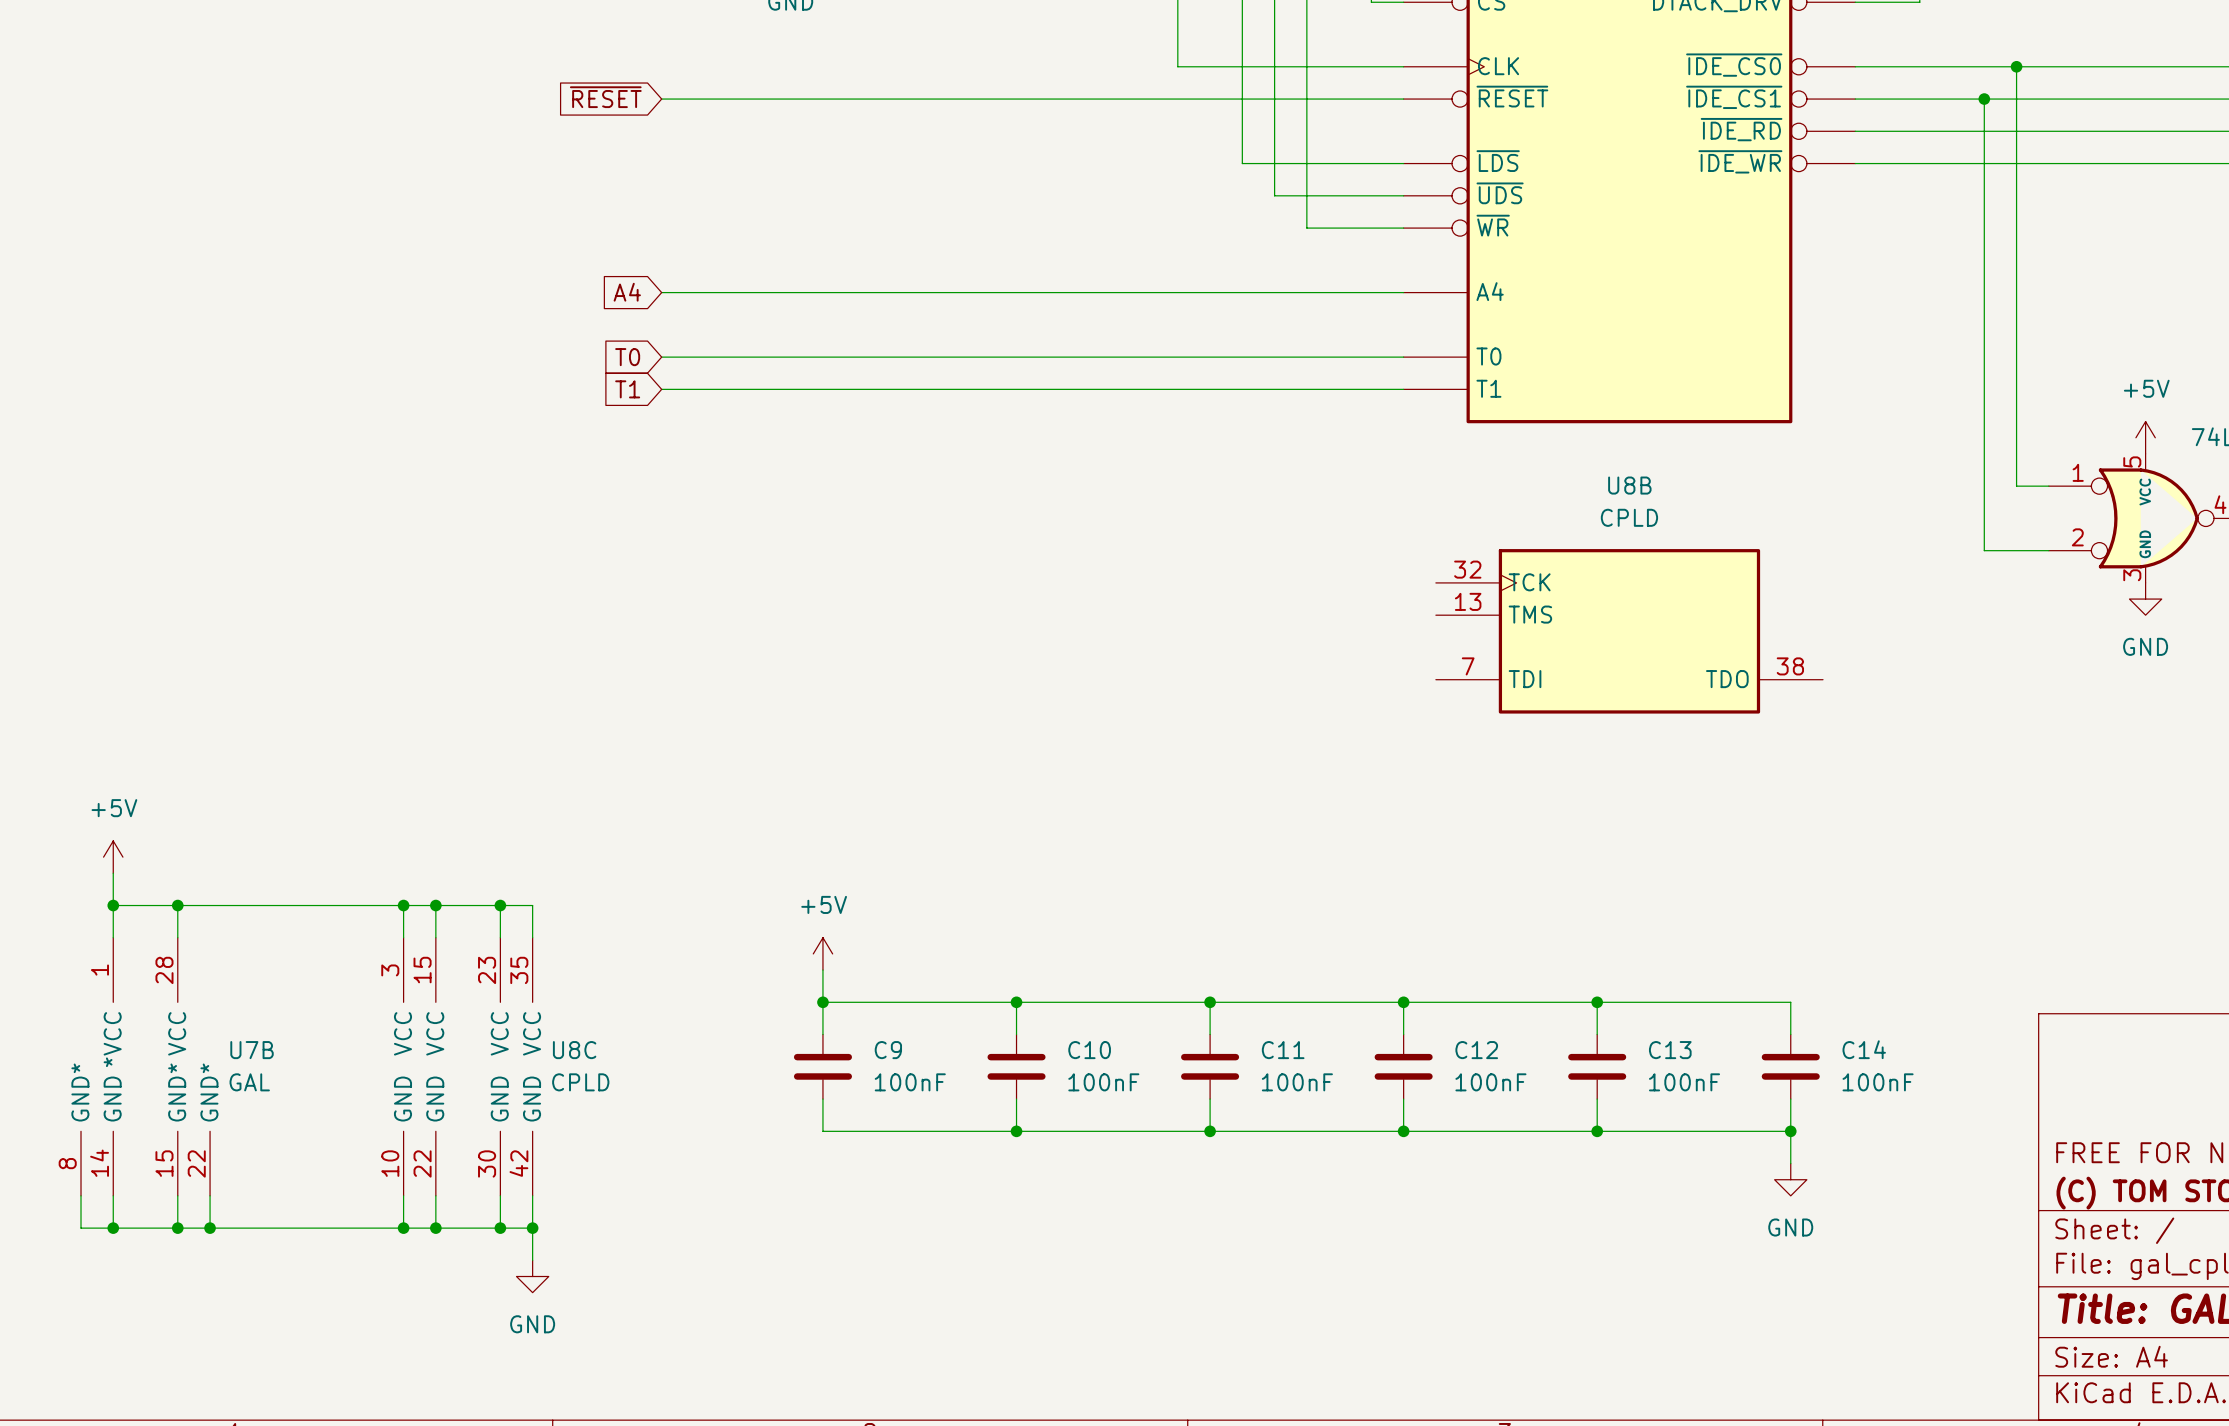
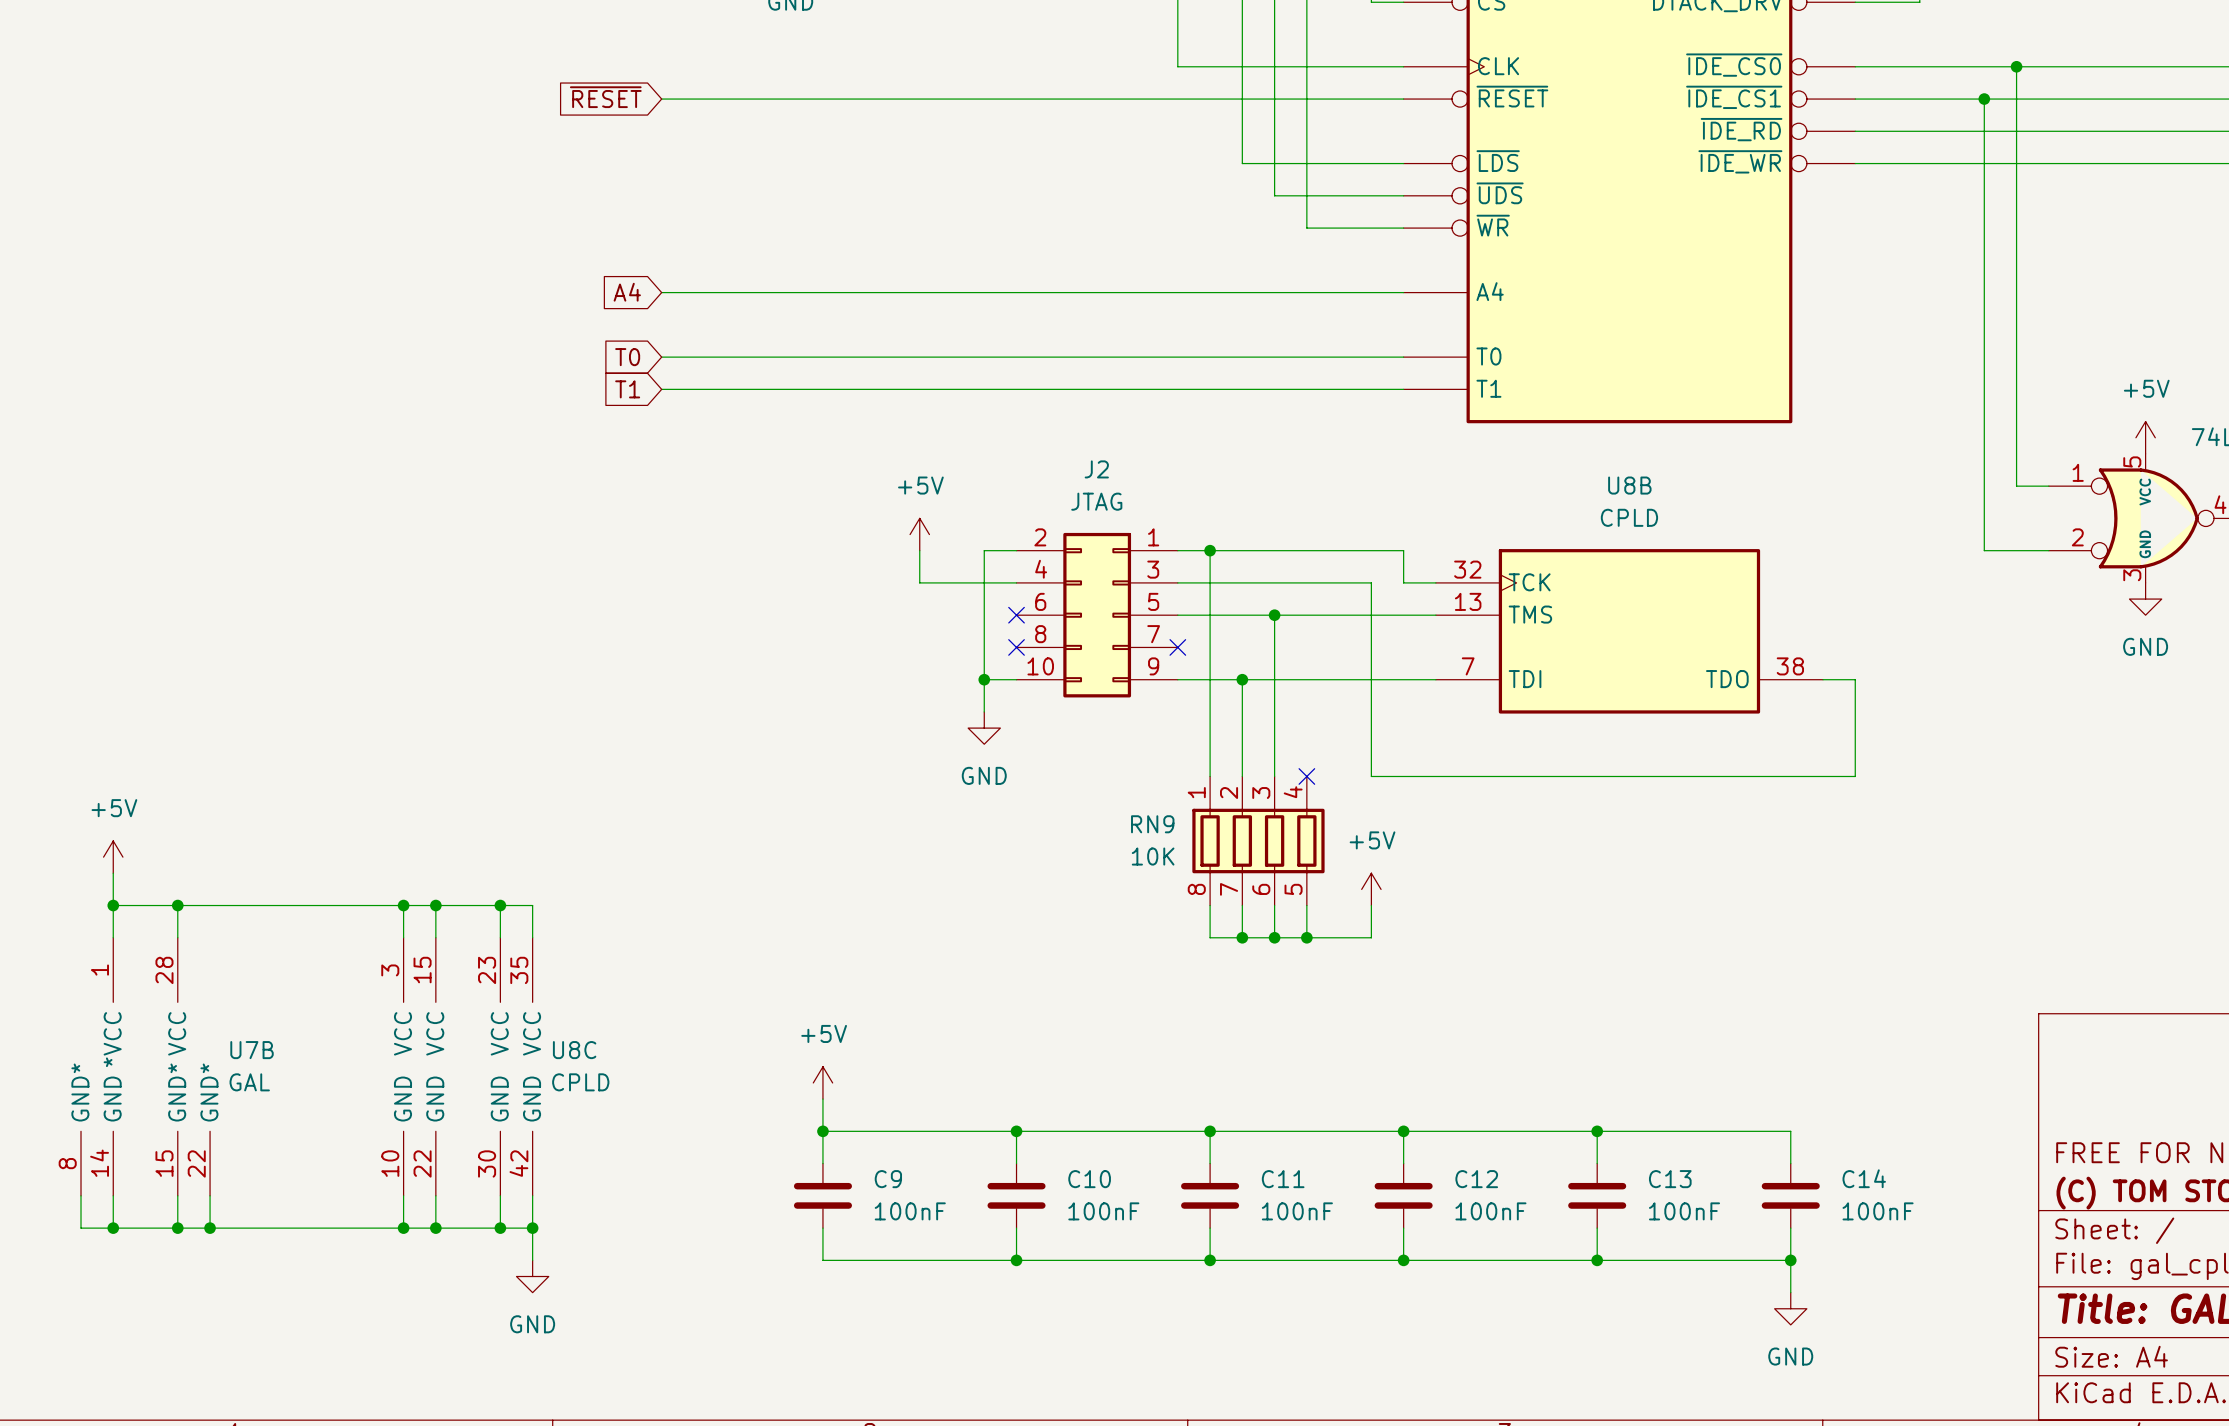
power symbol: none -> +5V (919, 534)
wire: none -> (919, 550) (919, 582) (1016, 582)
wire: none -> (1016, 550) (984, 550) (984, 711)
wire: none -> (1177, 550) (1403, 550) (1403, 582) (1435, 582)
wire: none -> (1210, 550) (1210, 776)
junction: none -> (1210, 550)
wire: none -> (1177, 582) (1371, 582) (1371, 776) (1855, 776) (1855, 679) (1823, 679)
no-connect mark: none -> (1016, 615)
J2: none -> JTAG (1097, 615)
wire: none -> (1177, 615) (1435, 615)
wire: none -> (1274, 615) (1274, 776)
junction: none -> (1274, 615)
no-connect mark: none -> (1016, 647)
no-connect mark: none -> (1177, 647)
wire: none -> (984, 679) (1016, 679)
junction: none -> (984, 679)
wire: none -> (1177, 679) (1435, 679)
wire: none -> (1242, 679) (1242, 776)
junction: none -> (1242, 679)
power symbol: none -> GND (984, 728)
no-connect mark: none -> (1306, 776)
RN9: none -> 10K (1258, 841)
power symbol: none -> +5V (1371, 889)
wire: none -> (1210, 905) (1210, 937) (1371, 937) (1371, 905)
wire: none -> (1242, 905) (1242, 937)
wire: none -> (1274, 905) (1274, 937)
junction: none -> (1242, 937)
junction: none -> (1274, 937)
junction: none -> (1306, 937)
power symbol position: +5V (822, 953) -> +5V (822, 1082)
wire: (822, 970) (822, 1034) -> none
wire: (822, 1002) (1790, 1002) (1790, 1034) -> none
junction: (822, 1002) -> none
wire: (1016, 1002) (1016, 1034) -> (822, 1131) (822, 1163)
junction: (1016, 1002) -> none
wire: (1210, 1002) (1210, 1034) -> (1210, 1228) (1210, 1260)
junction: (1210, 1002) -> none
wire: (1403, 1002) (1403, 1034) -> (1403, 1228) (1403, 1260)
junction: (1403, 1002) -> none
wire: (1597, 1002) (1597, 1034) -> (1306, 905) (1306, 937)
junction: (1597, 1002) -> none
C9 position: (822, 1066) -> (822, 1195)
C10 position: (1016, 1066) -> (1016, 1195)
C11 position: (1210, 1066) -> (1210, 1195)
C12 position: (1403, 1066) -> (1403, 1195)
C13 position: (1597, 1066) -> (1597, 1195)
C14 position: (1790, 1066) -> (1790, 1195)
wire: (1016, 1099) (1016, 1131) -> (1016, 1163) (1016, 1131)
wire: (1210, 1099) (1210, 1131) -> (1210, 1163) (1210, 1131)
wire: (1403, 1099) (1403, 1131) -> (1403, 1163) (1403, 1131)
wire: (1597, 1099) (1597, 1131) -> (1597, 1163) (1597, 1131)
wire: (1790, 1099) (1790, 1131) -> (1597, 1228) (1597, 1260)
junction: none -> (822, 1131)
junction: (1790, 1131) -> none
power symbol position: GND (1790, 1179) -> GND (1790, 1308)
wire: none -> (822, 1228) (822, 1260) (1790, 1260)
wire: none -> (1016, 1228) (1016, 1260)
wire: none -> (1790, 1228) (1790, 1292)
junction: none -> (1016, 1260)
junction: none -> (1210, 1260)
junction: none -> (1403, 1260)
junction: none -> (1597, 1260)
junction: none -> (1790, 1260)

